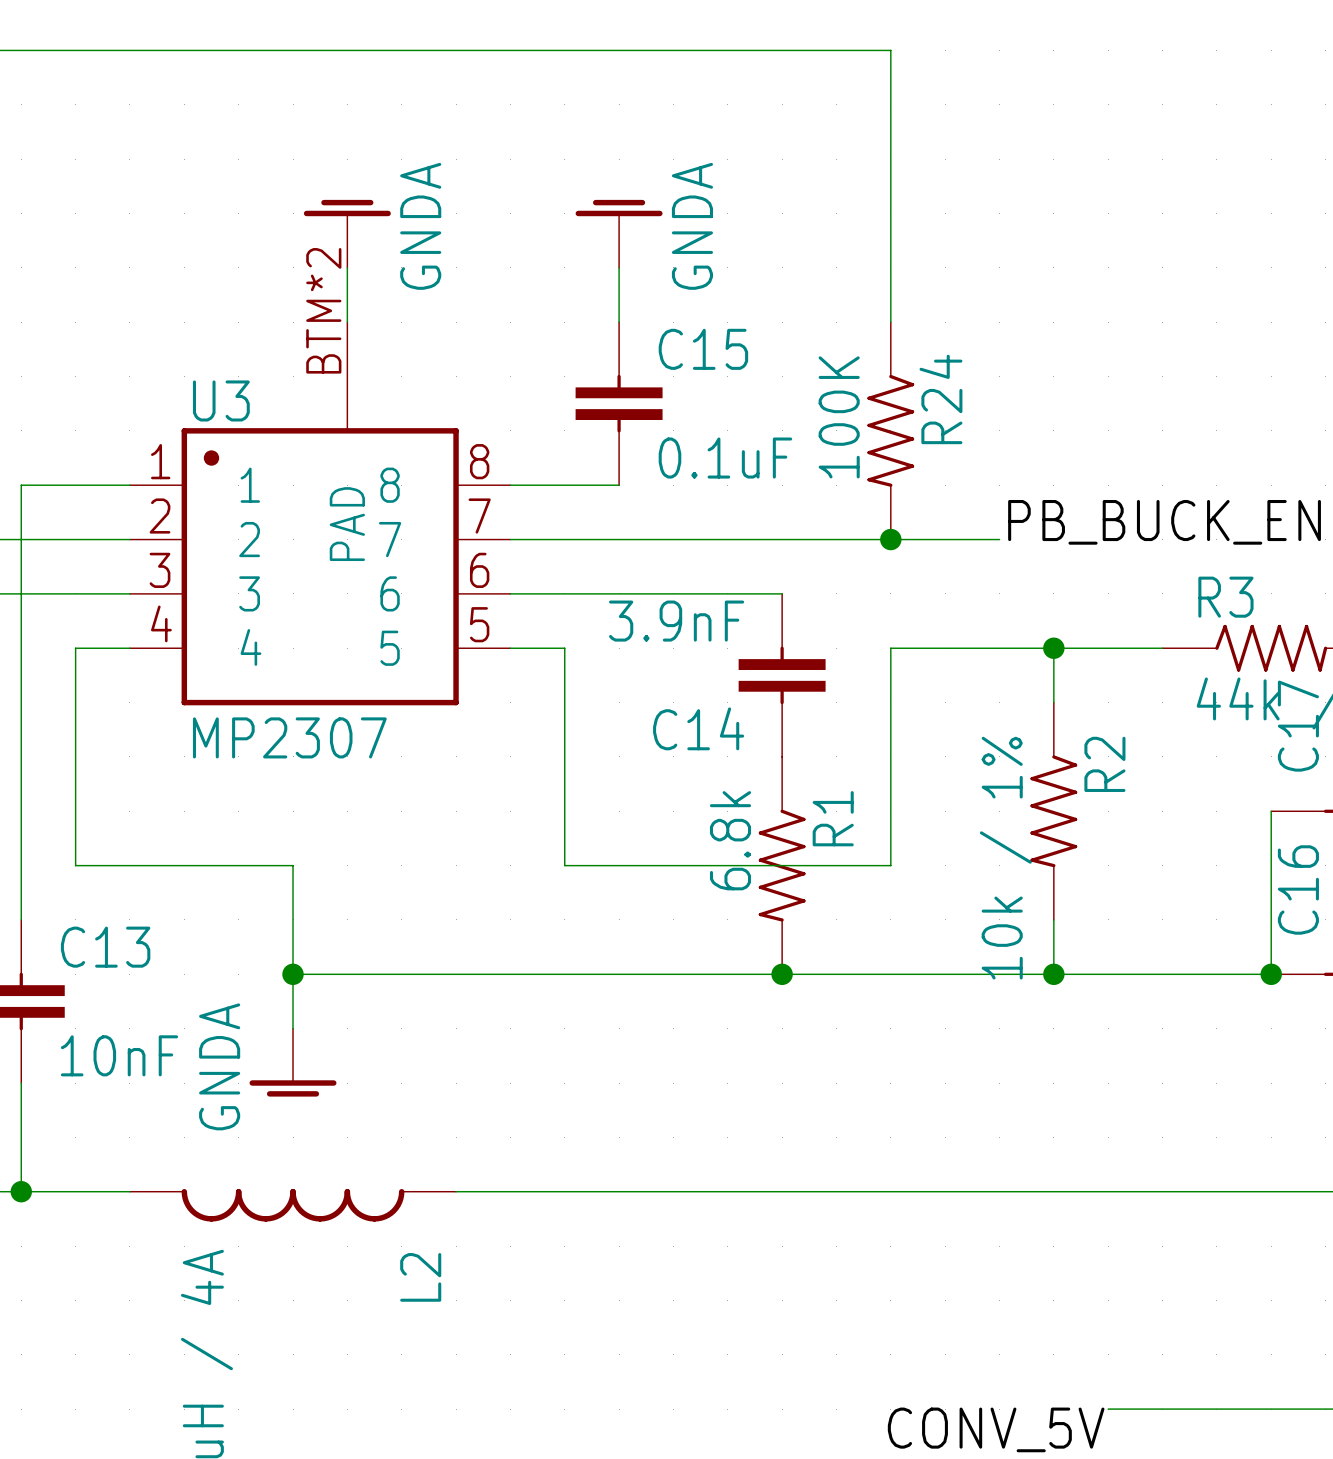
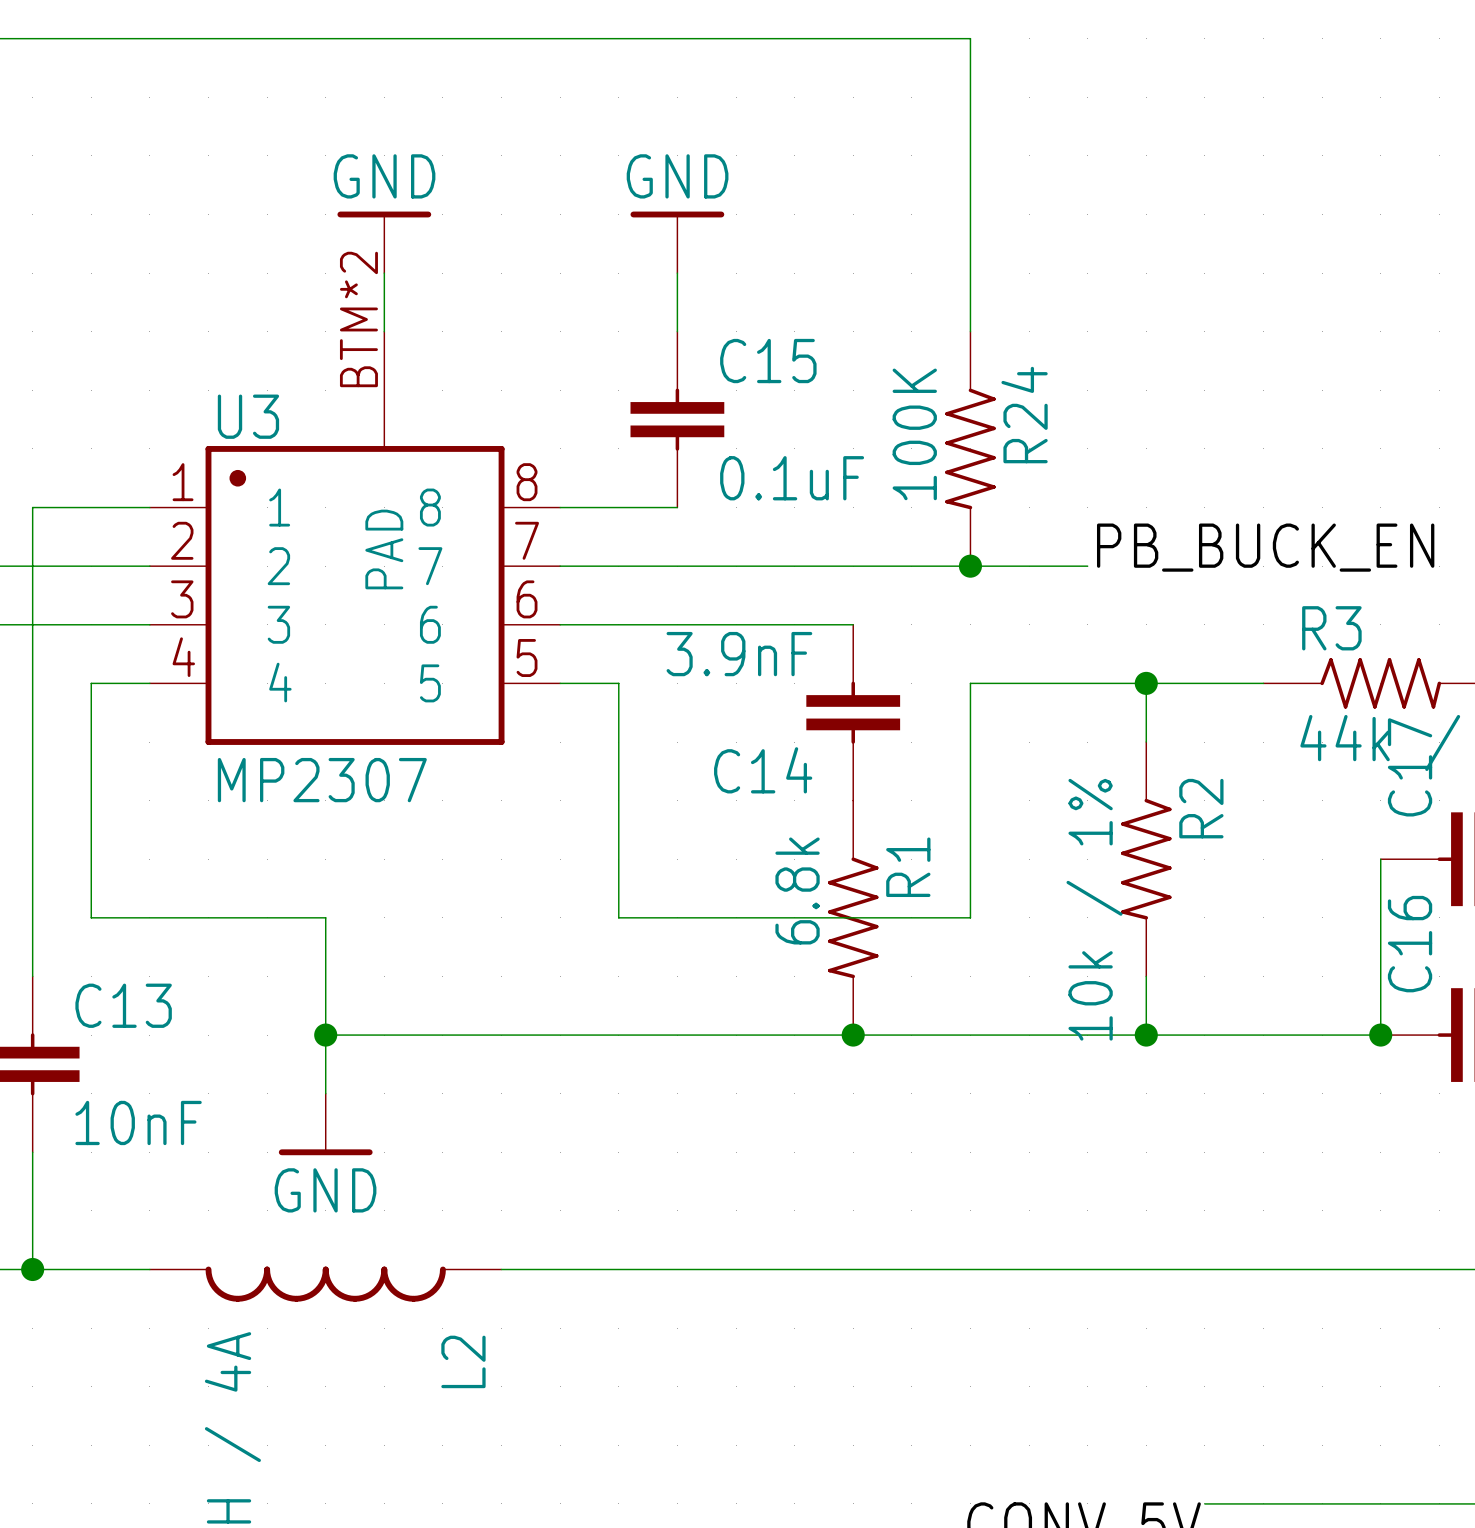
power symbol: GNDA (347, 233) -> GND (384, 242)
power symbol: GNDA (619, 233) -> GND (677, 242)
power symbol: GNDA (293, 1062) -> GND (325, 1124)

